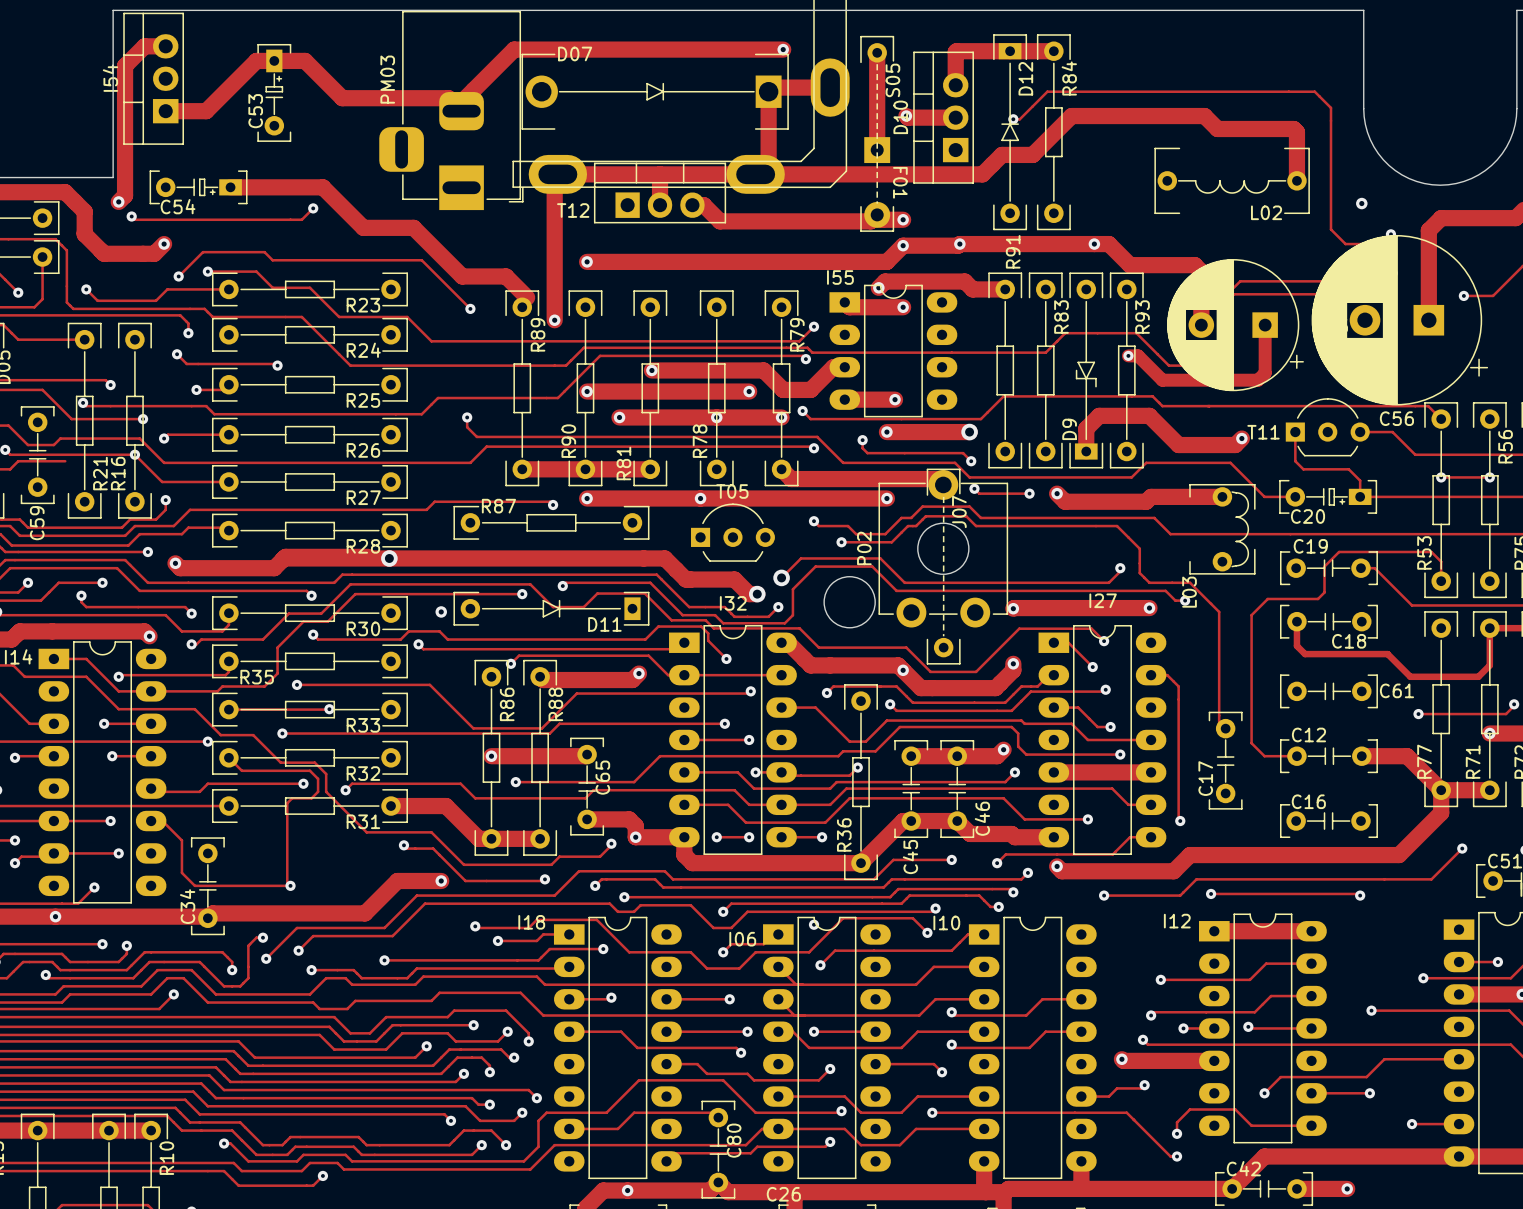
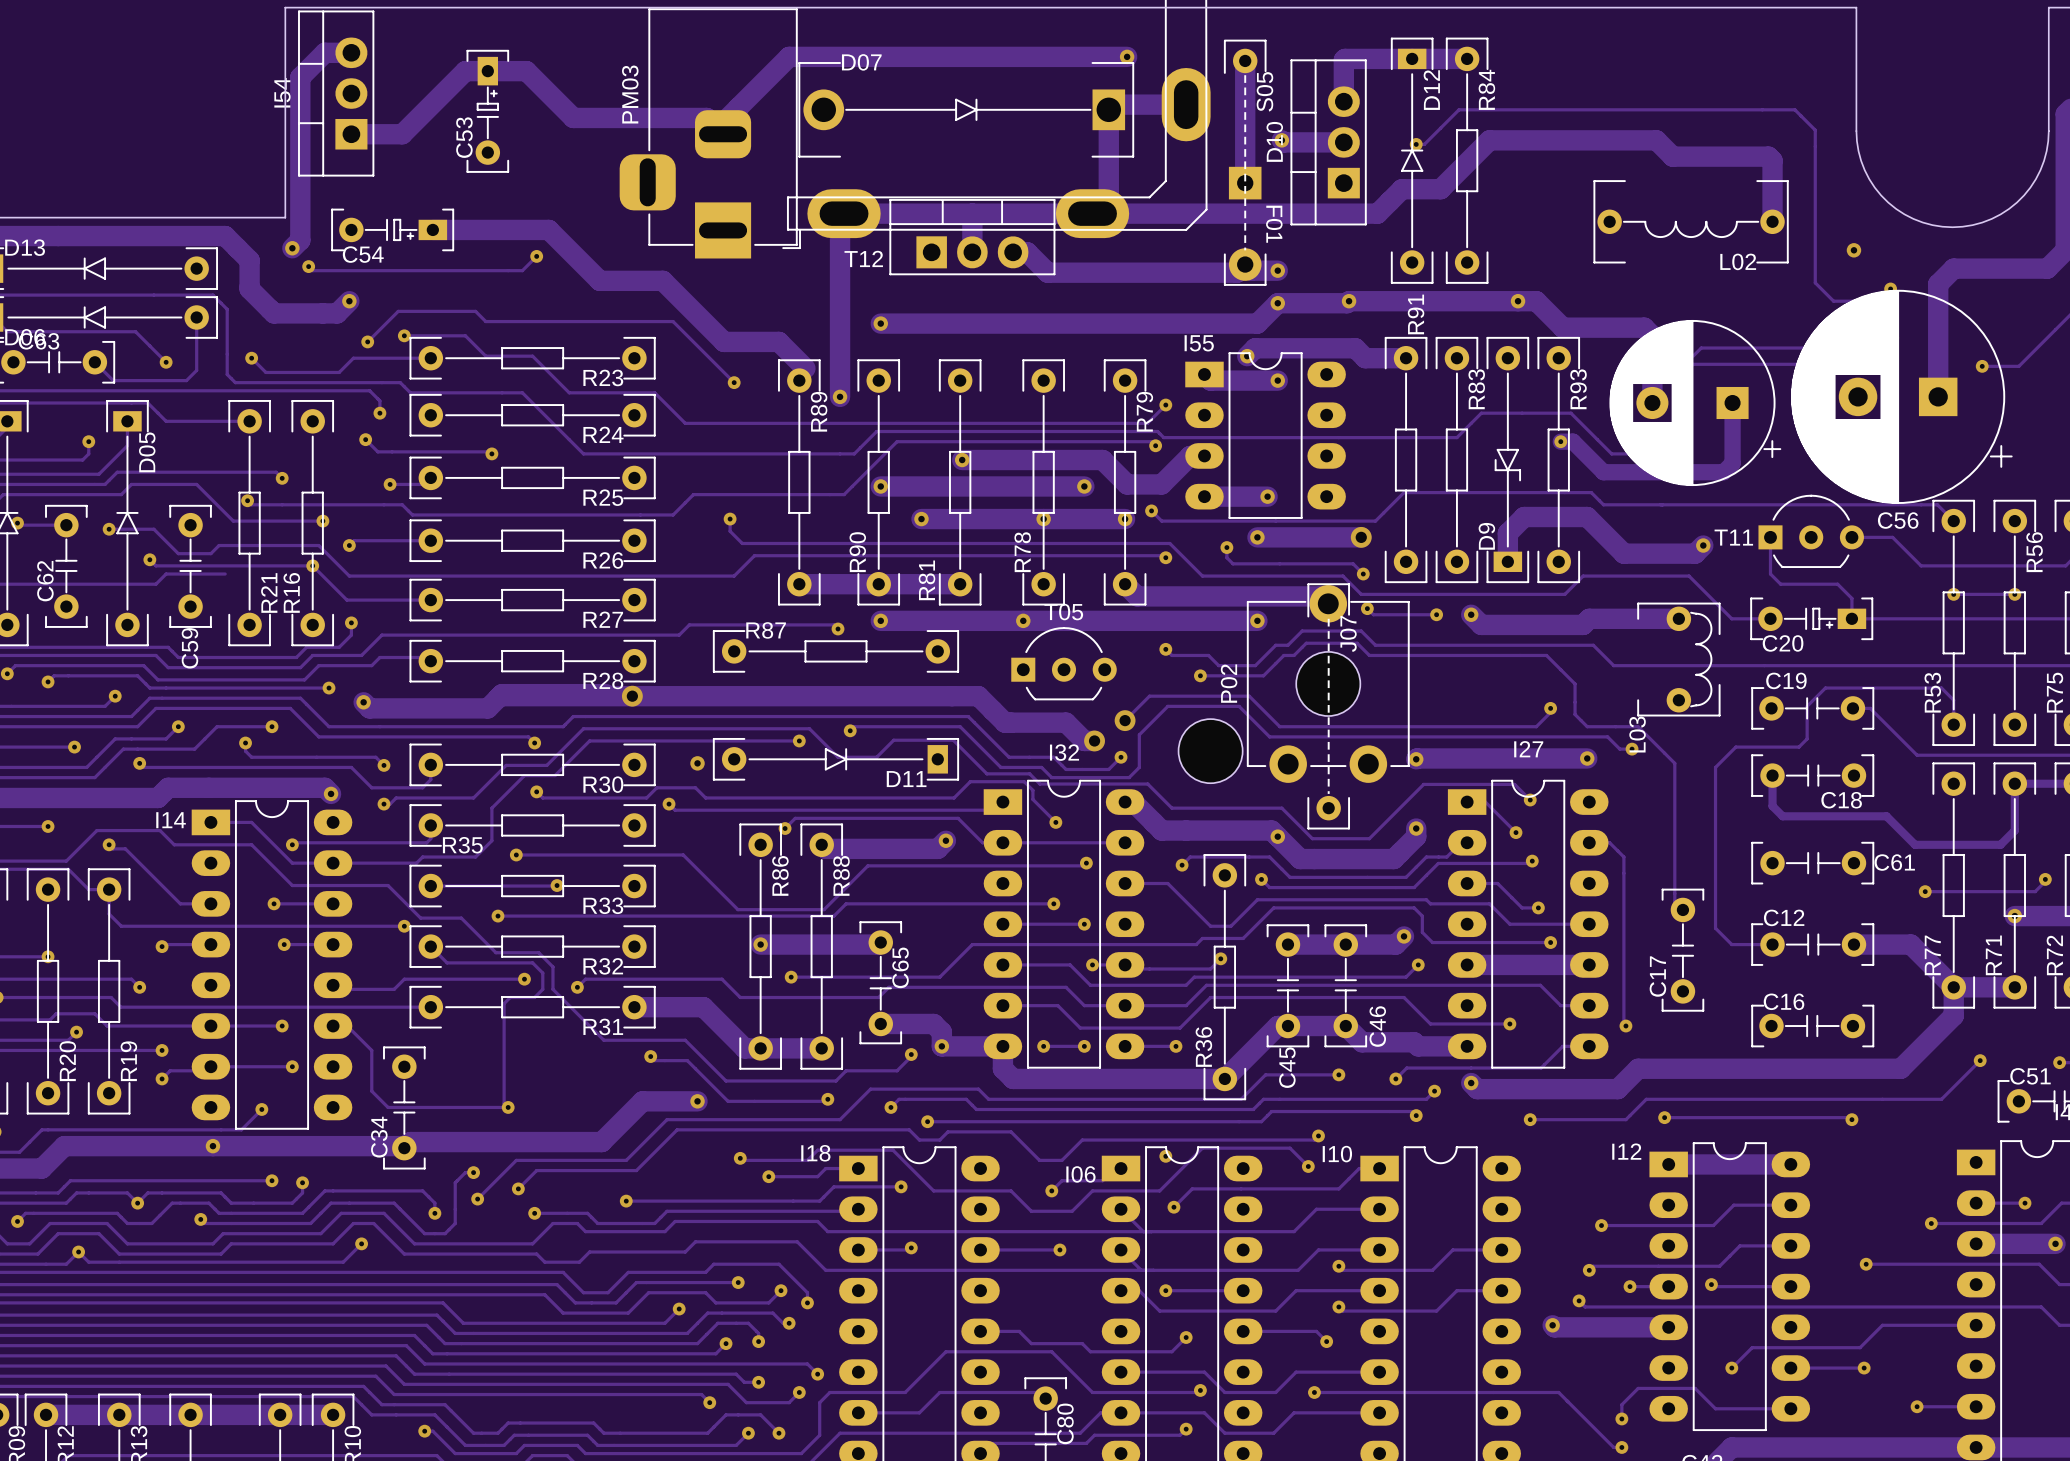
track: (998, 906) (990, 906) (979, 895) (909, 895) (901, 903) (731, 903) (723, 911) -> none
via: (998, 906) -> none
via: (723, 911) -> none
track: (569, 1031) (621, 1031) (637, 1047) (736, 1047) (741, 1052) -> none
track: (666, 1031) (747, 1031) -> none
via: (747, 1031) -> none
via: (741, 1052) -> none
track: (1144, 1085) (1141, 1088) (1117, 1088) (1108, 1096) (1081, 1096) -> none
via: (1144, 1085) -> none

